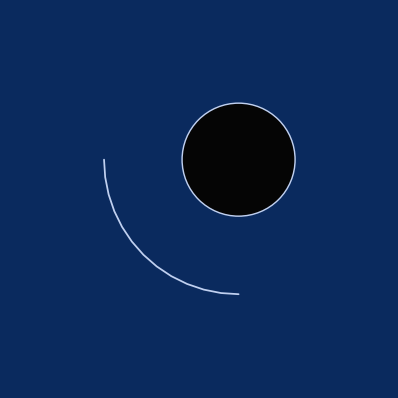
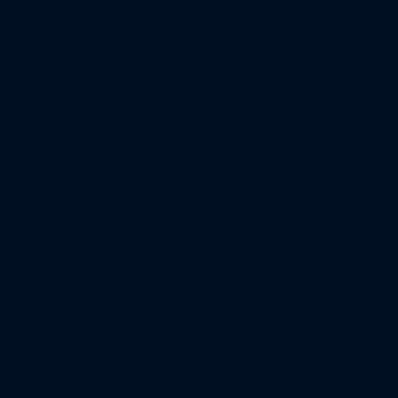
board edge: (104, 159) (105, 177) (114, 211) (122, 226) (143, 254) (171, 276) (187, 283) (221, 293) (238, 294) -> none
part: (238, 159) -> none

